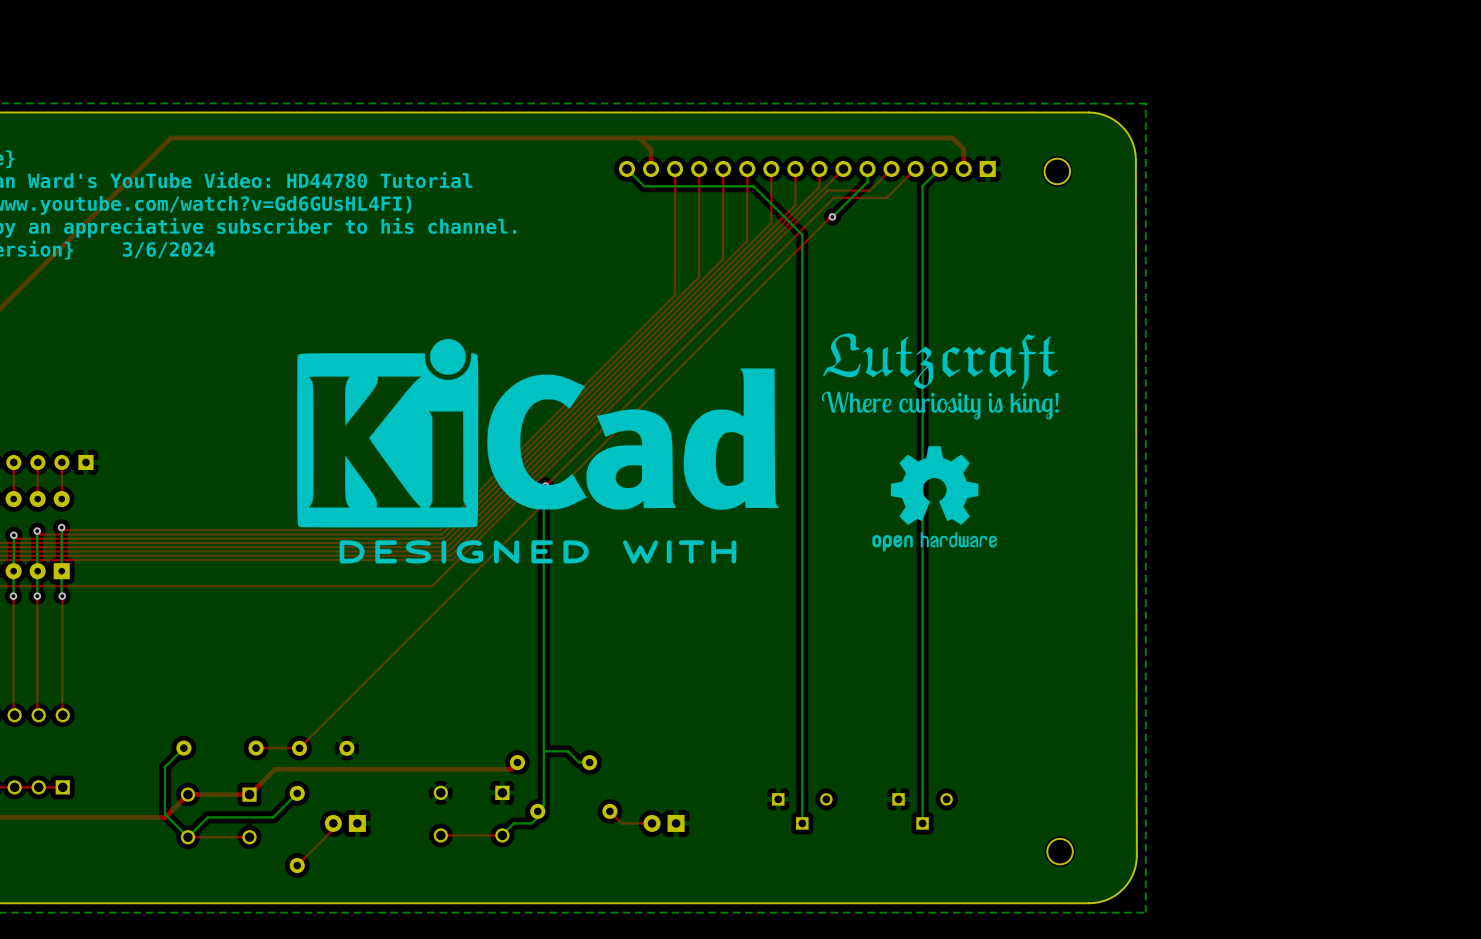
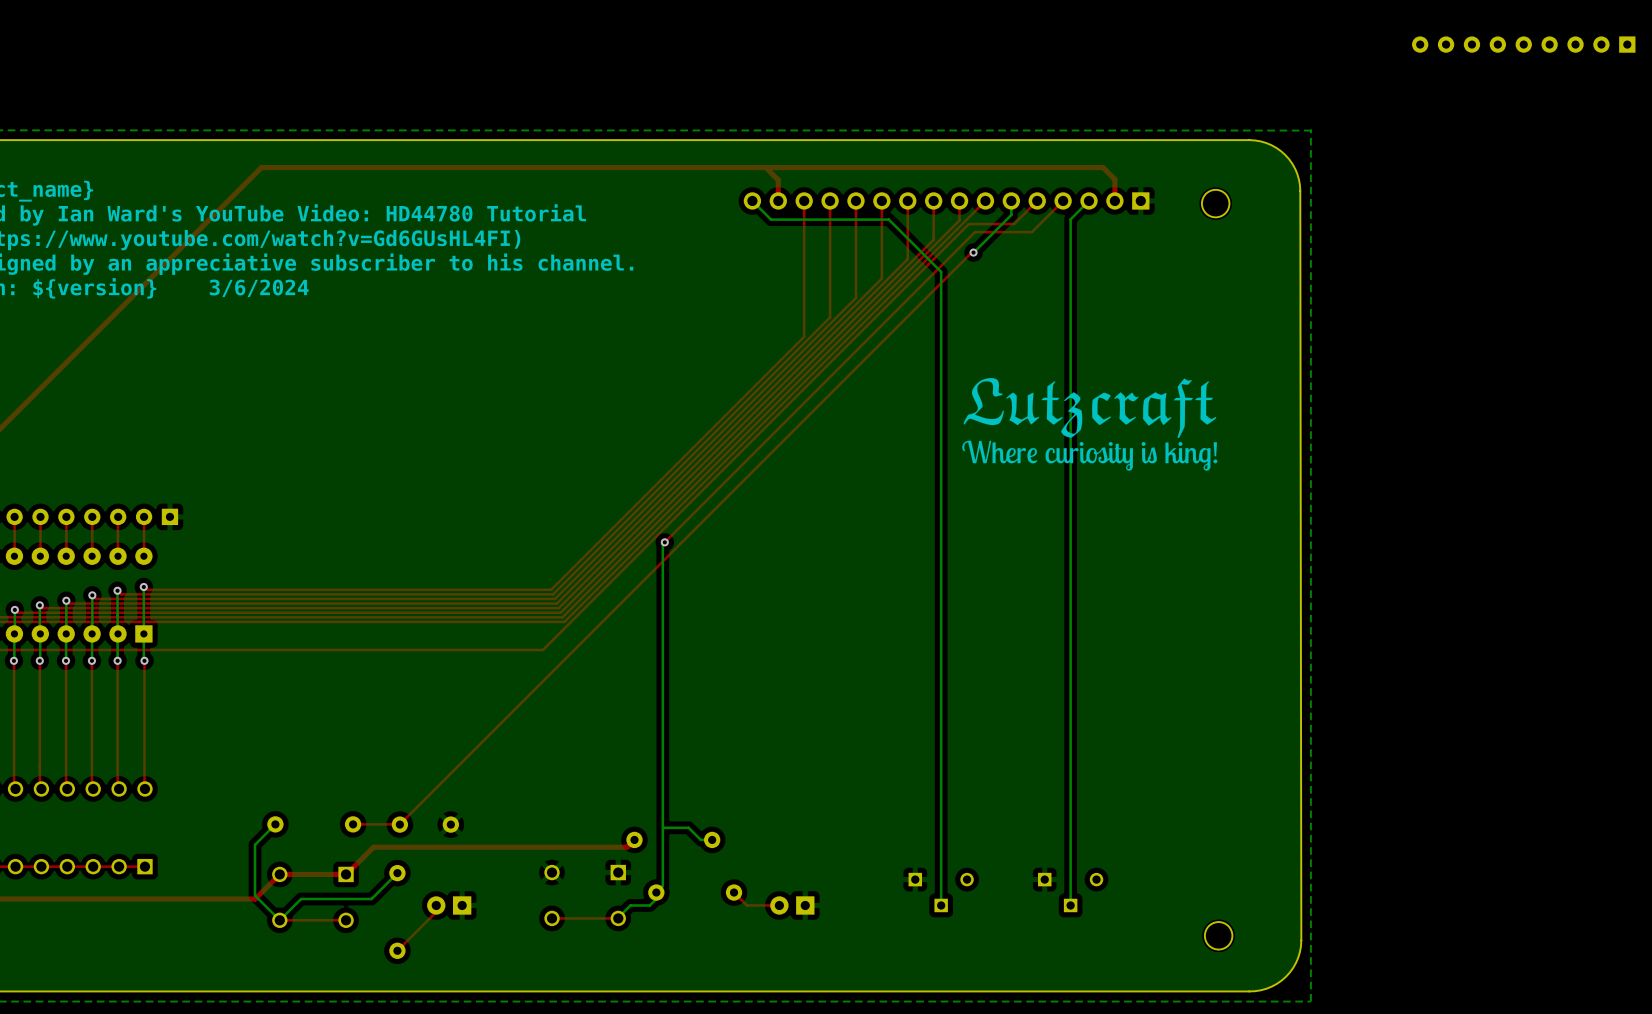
part: none -> (1523, 44)
drawing: [297, 339, 779, 564] -> none
drawing: [872, 446, 997, 552] -> none

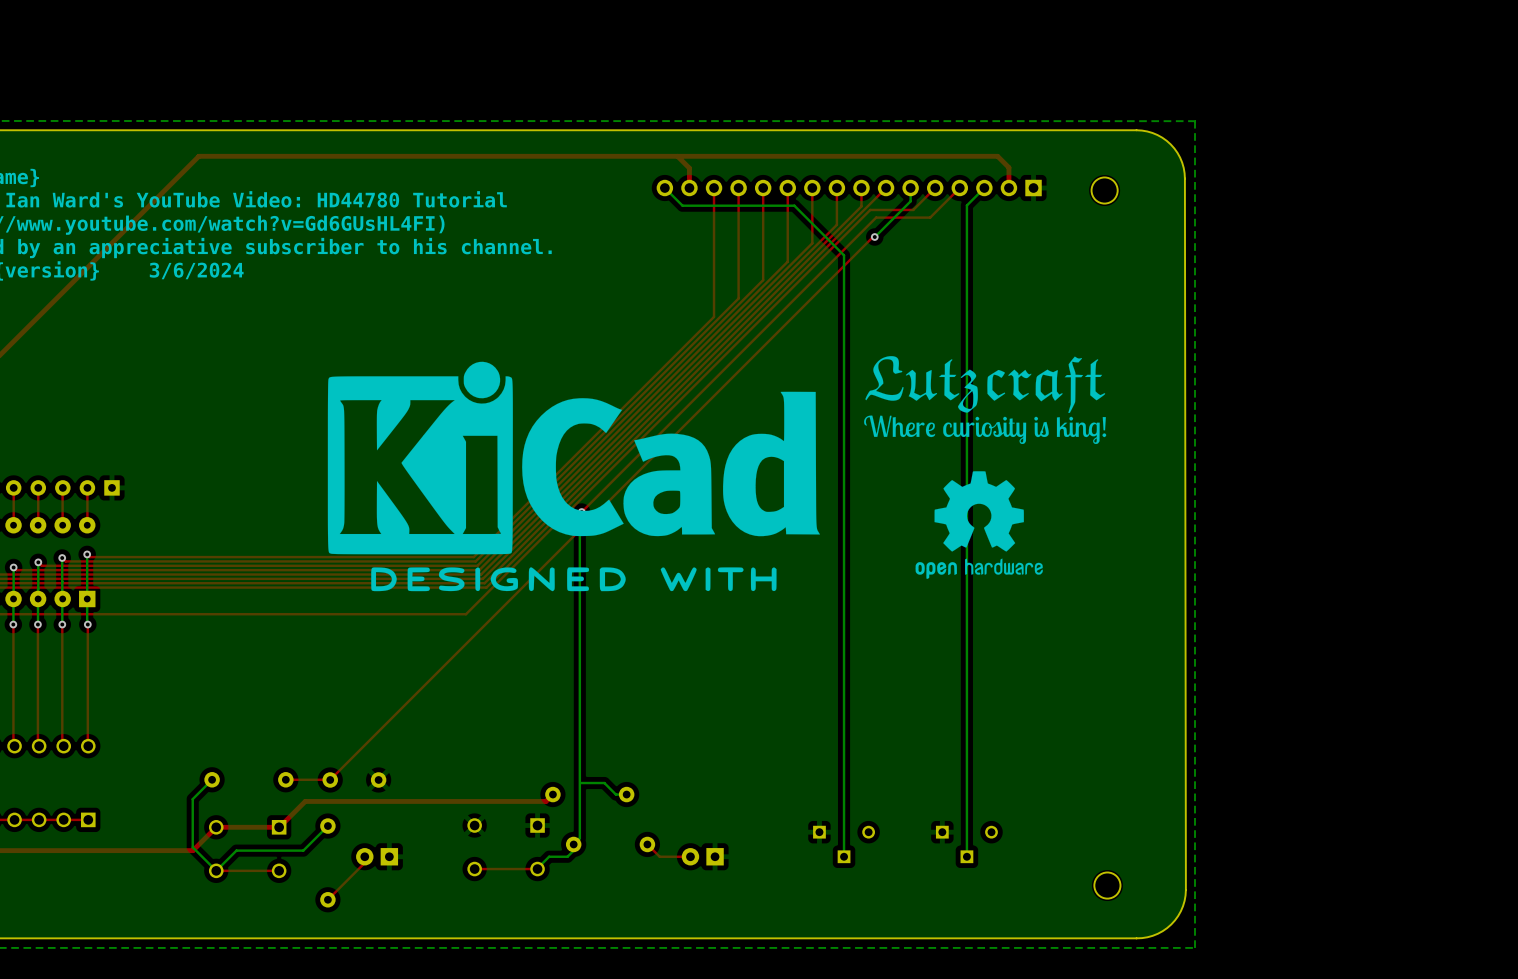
part: (1523, 44) -> none
drawing: none -> [327, 361, 820, 592]
drawing: none -> [915, 471, 1043, 579]

